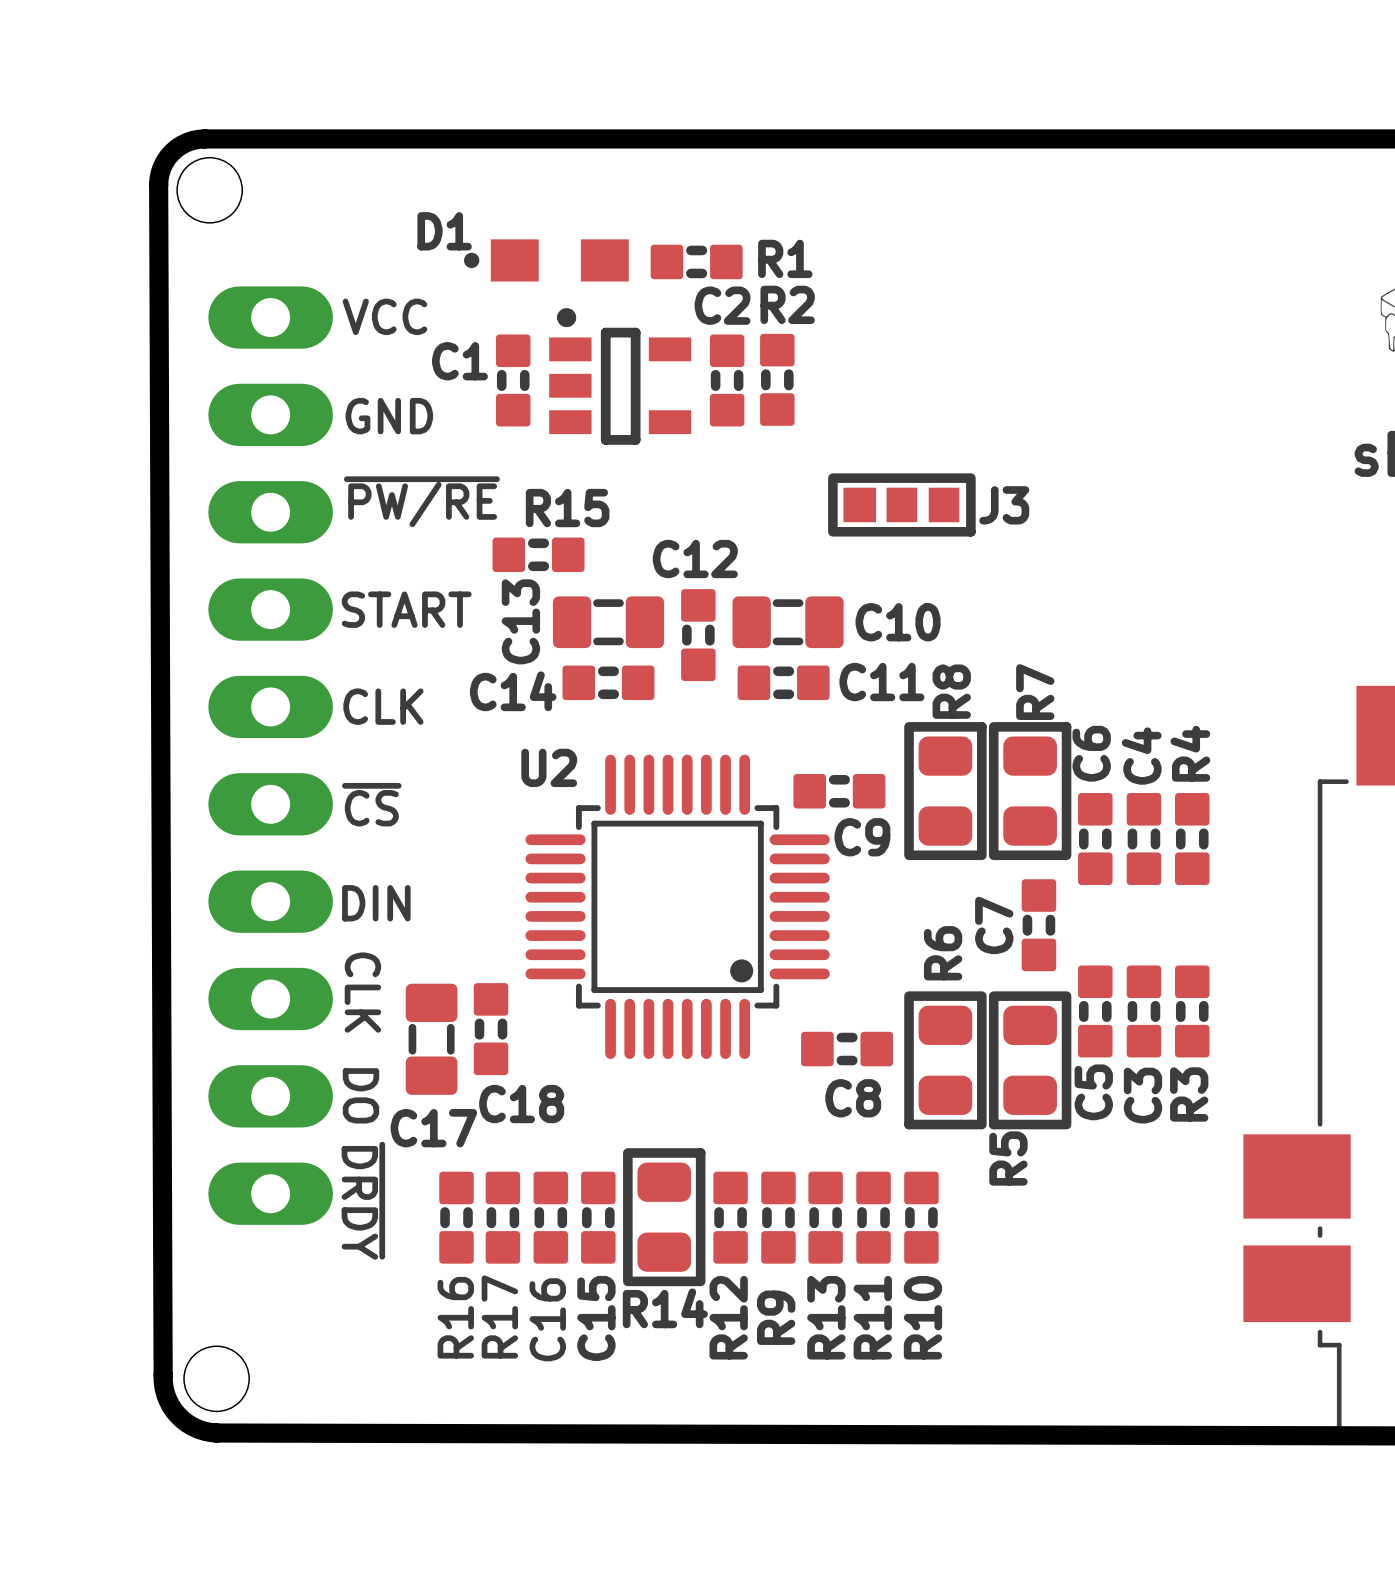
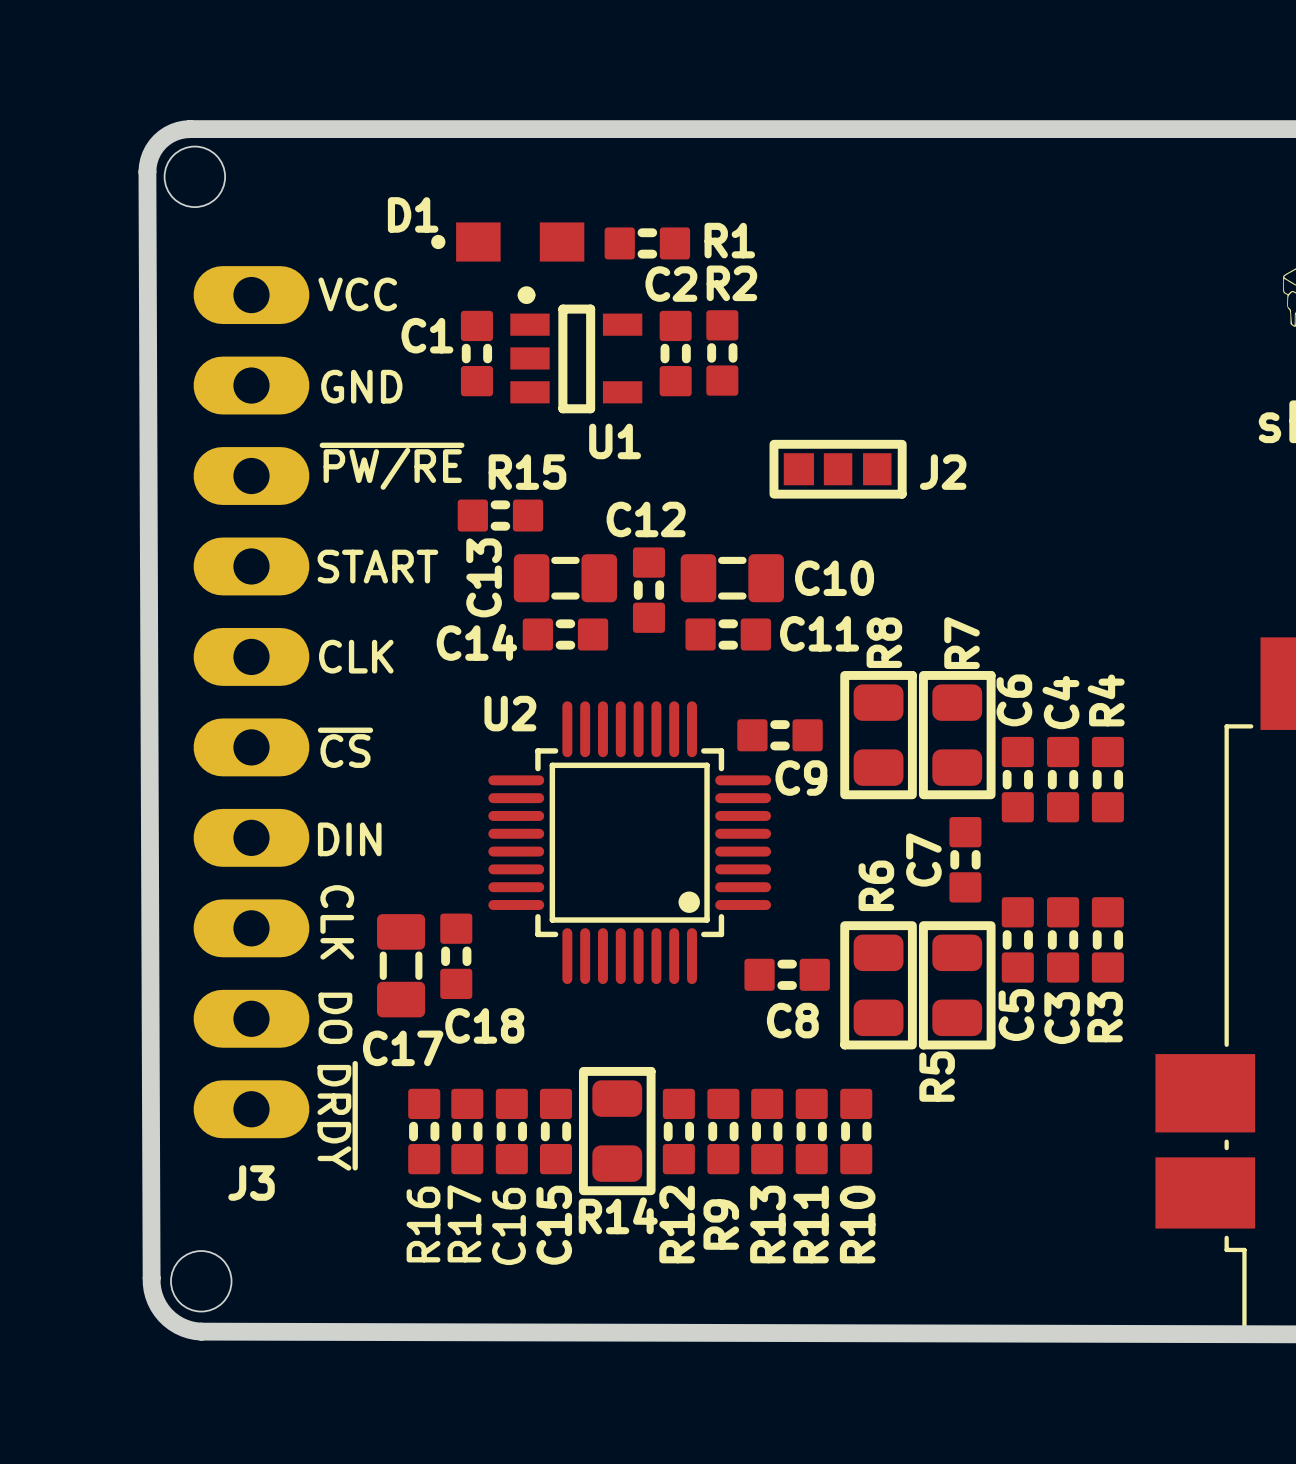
U1 name: none -> U1 (615, 441)
J3 name position: J3 (1004, 505) -> J3 (251, 1182)
J2 name: none -> J2 (943, 472)

